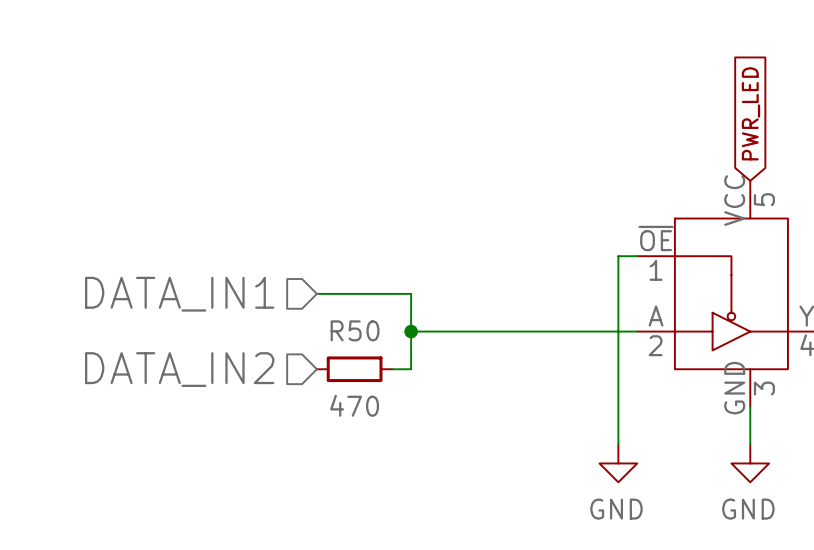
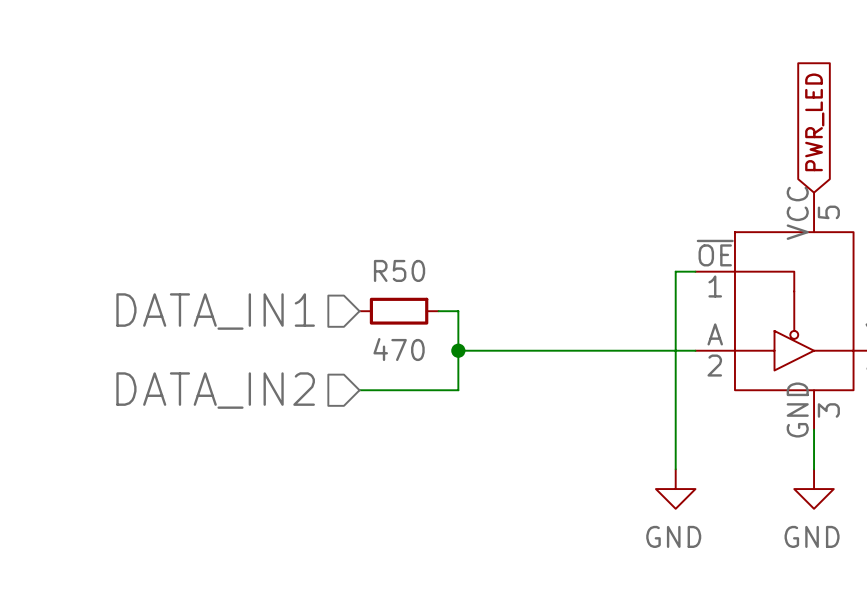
wire: (316, 293) (392, 293) -> (359, 390) (438, 390)
R50 position: (354, 369) -> (399, 311)

